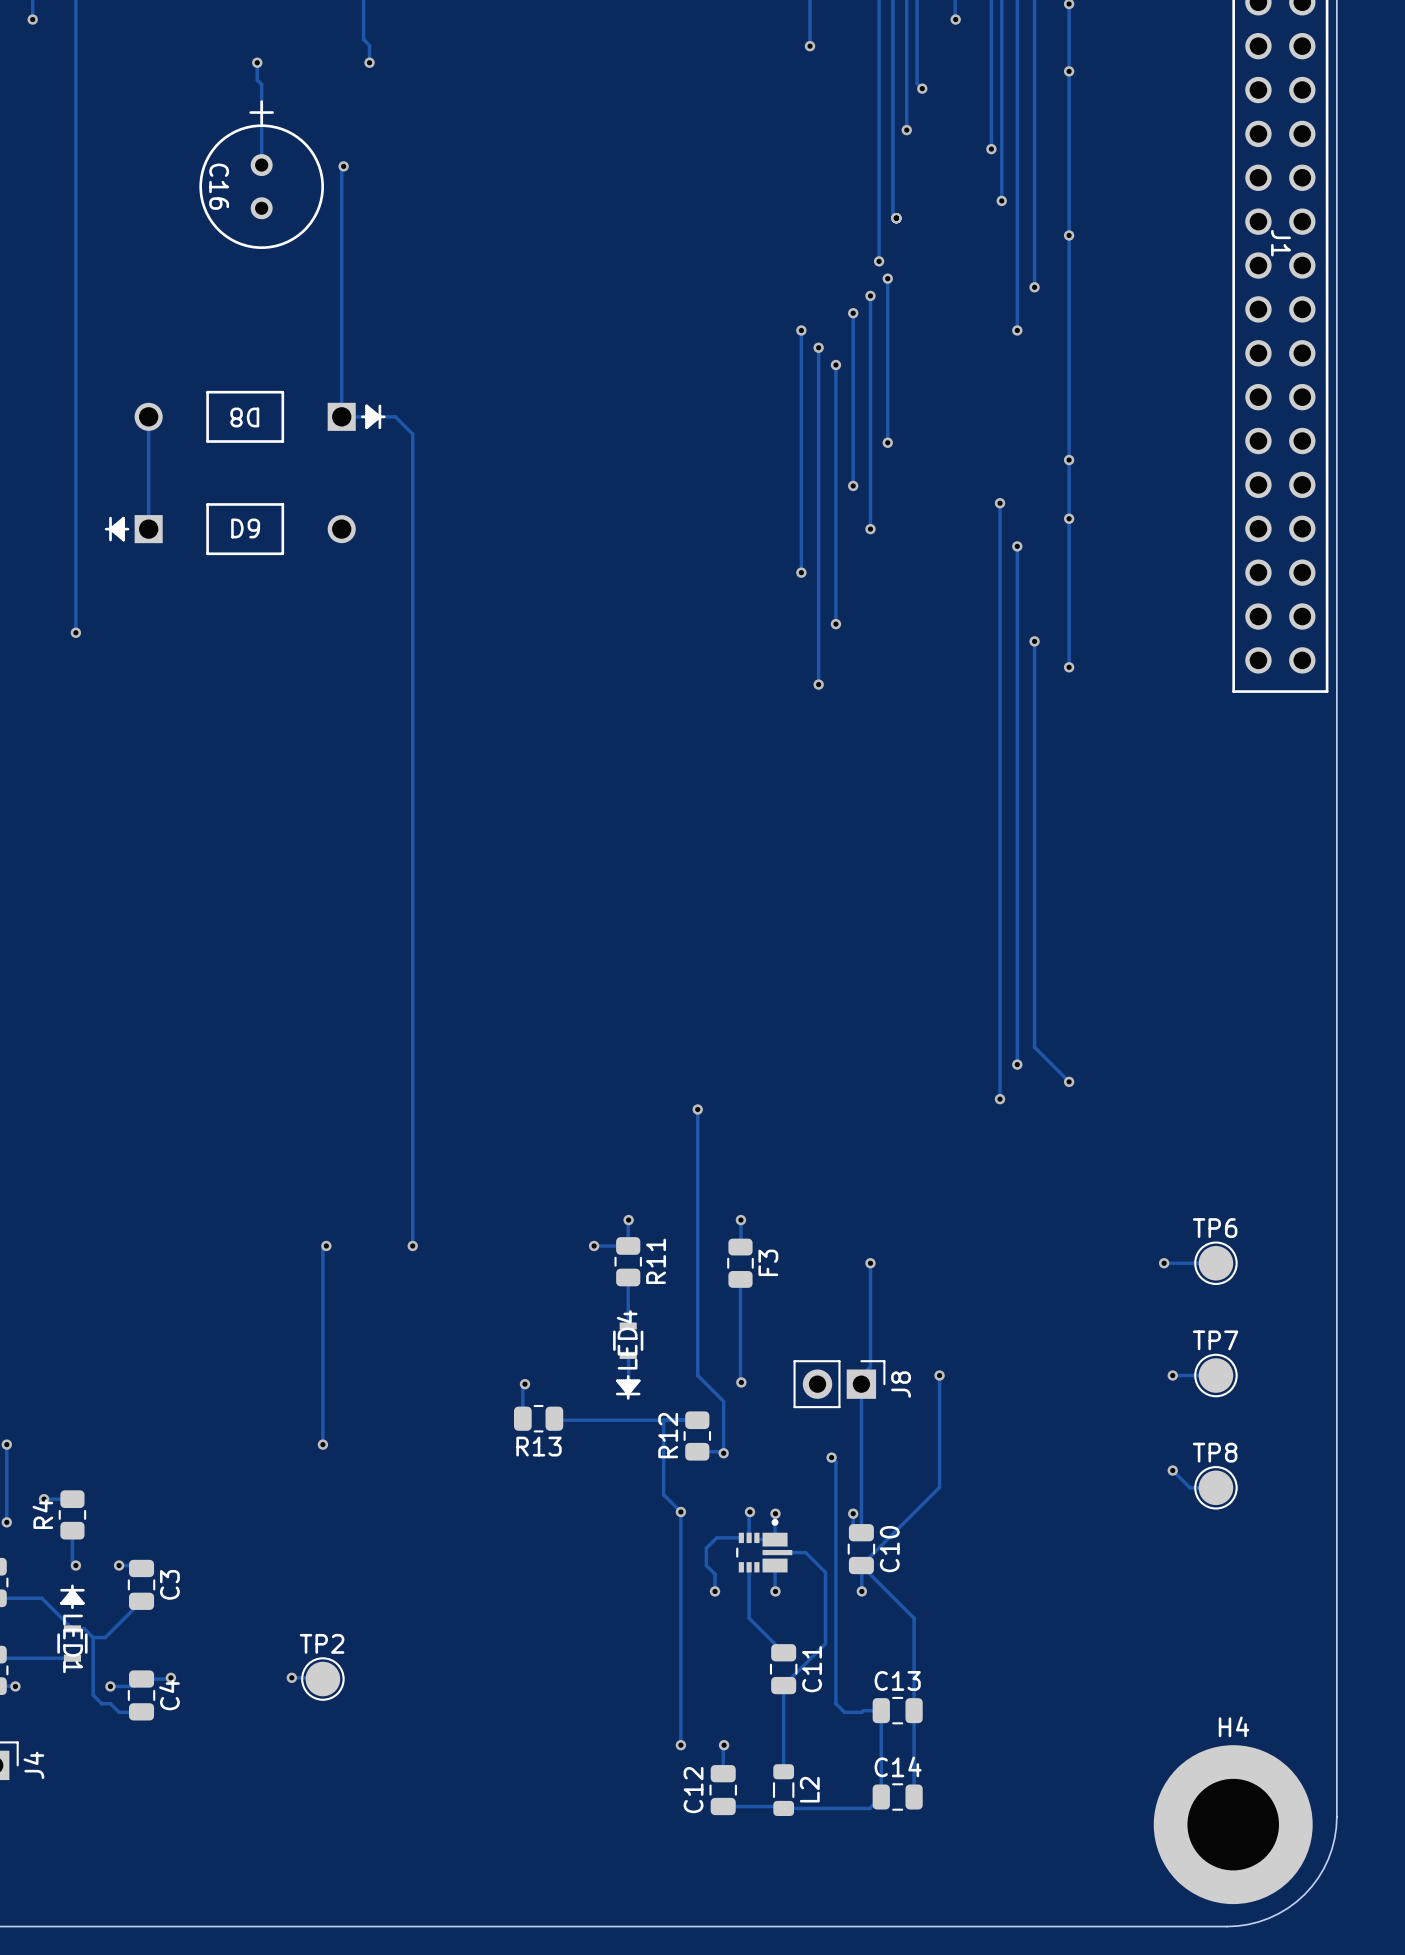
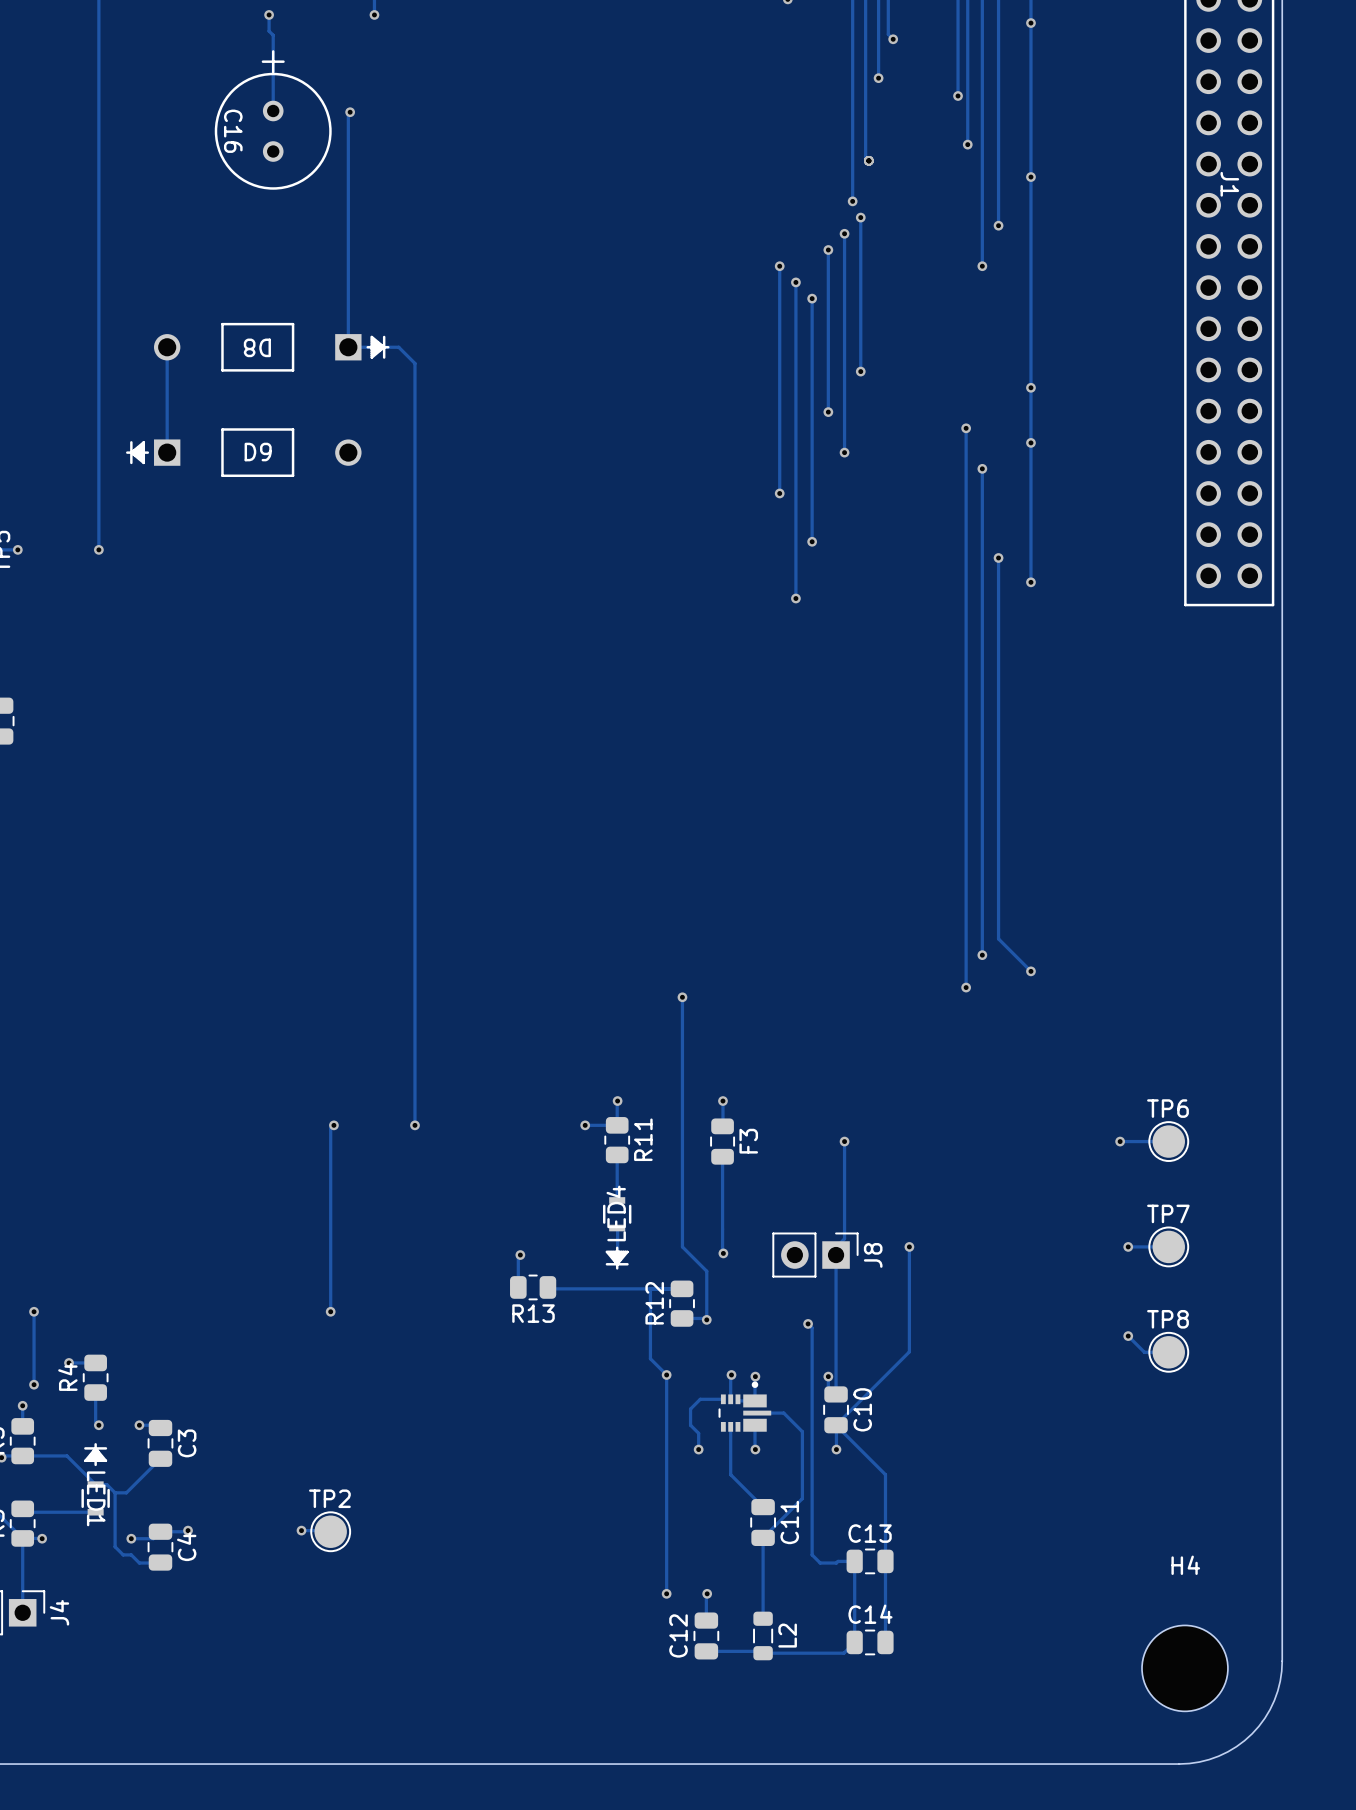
H4 footprint: [1153, 1745, 1313, 1905] -> [1142, 1625, 1228, 1712]

